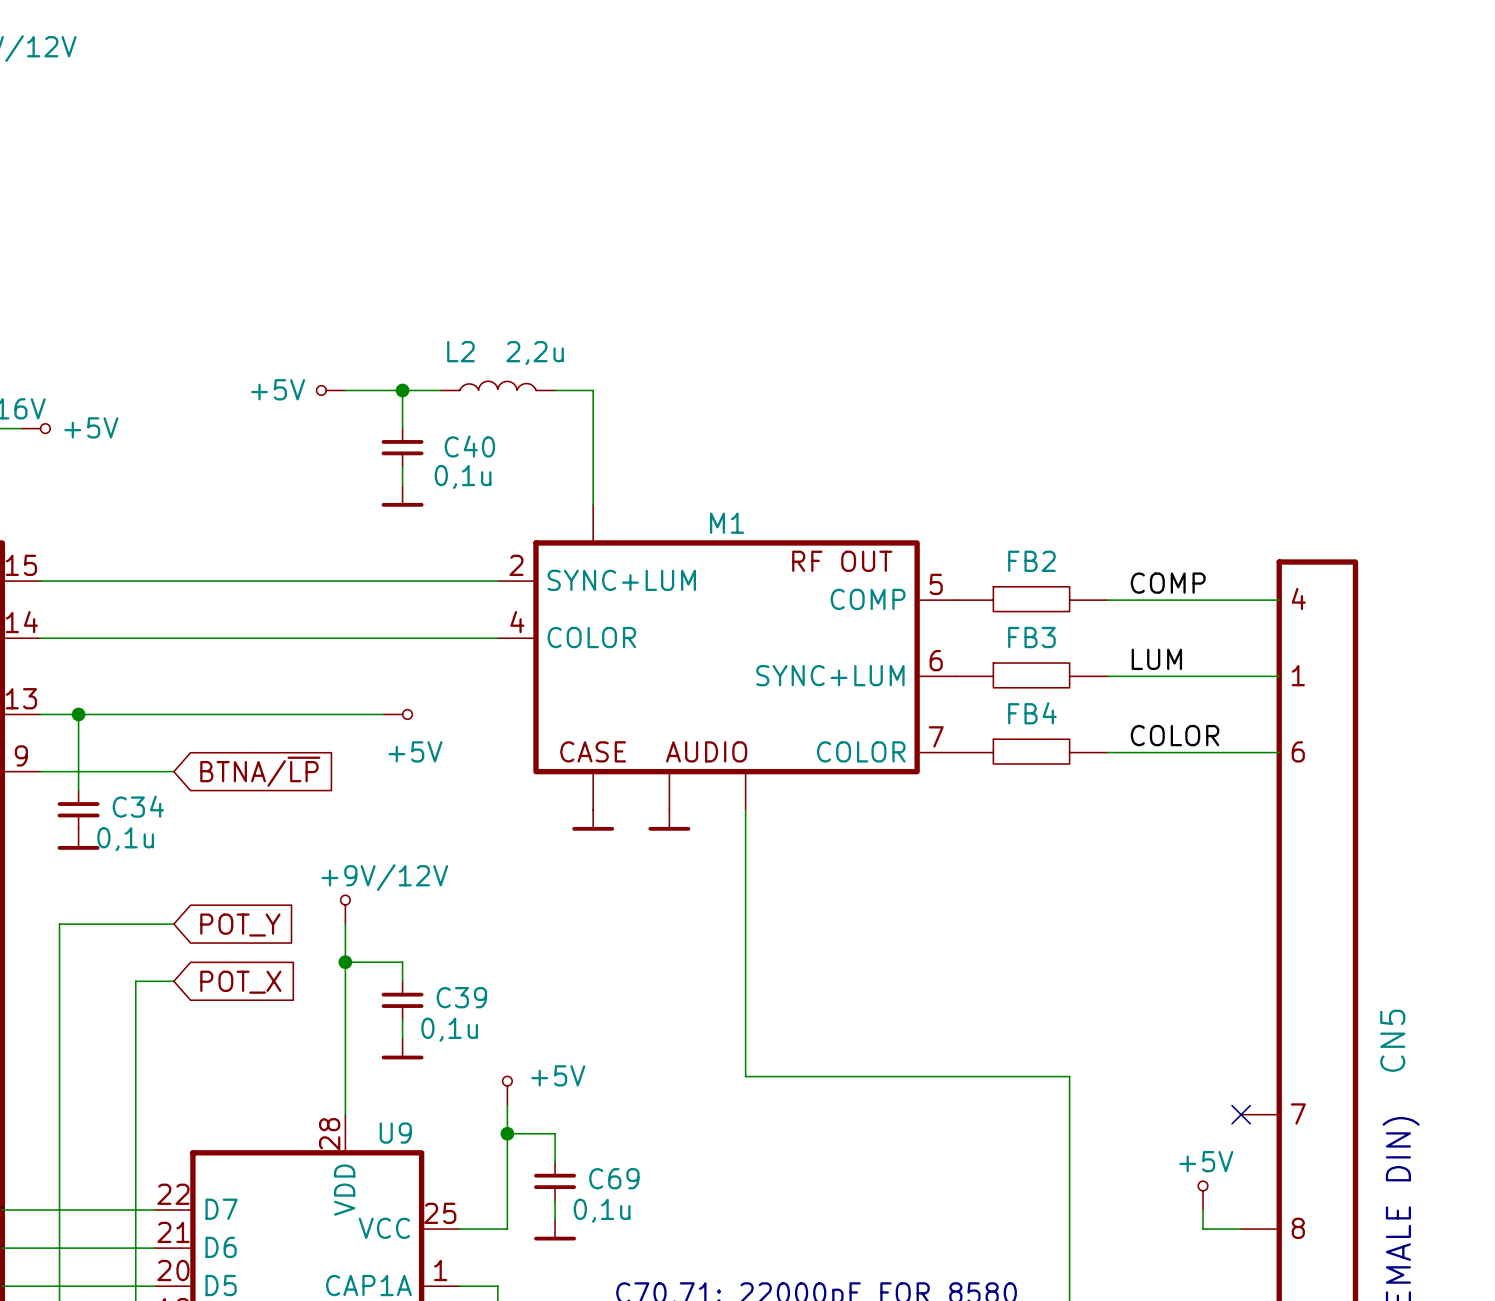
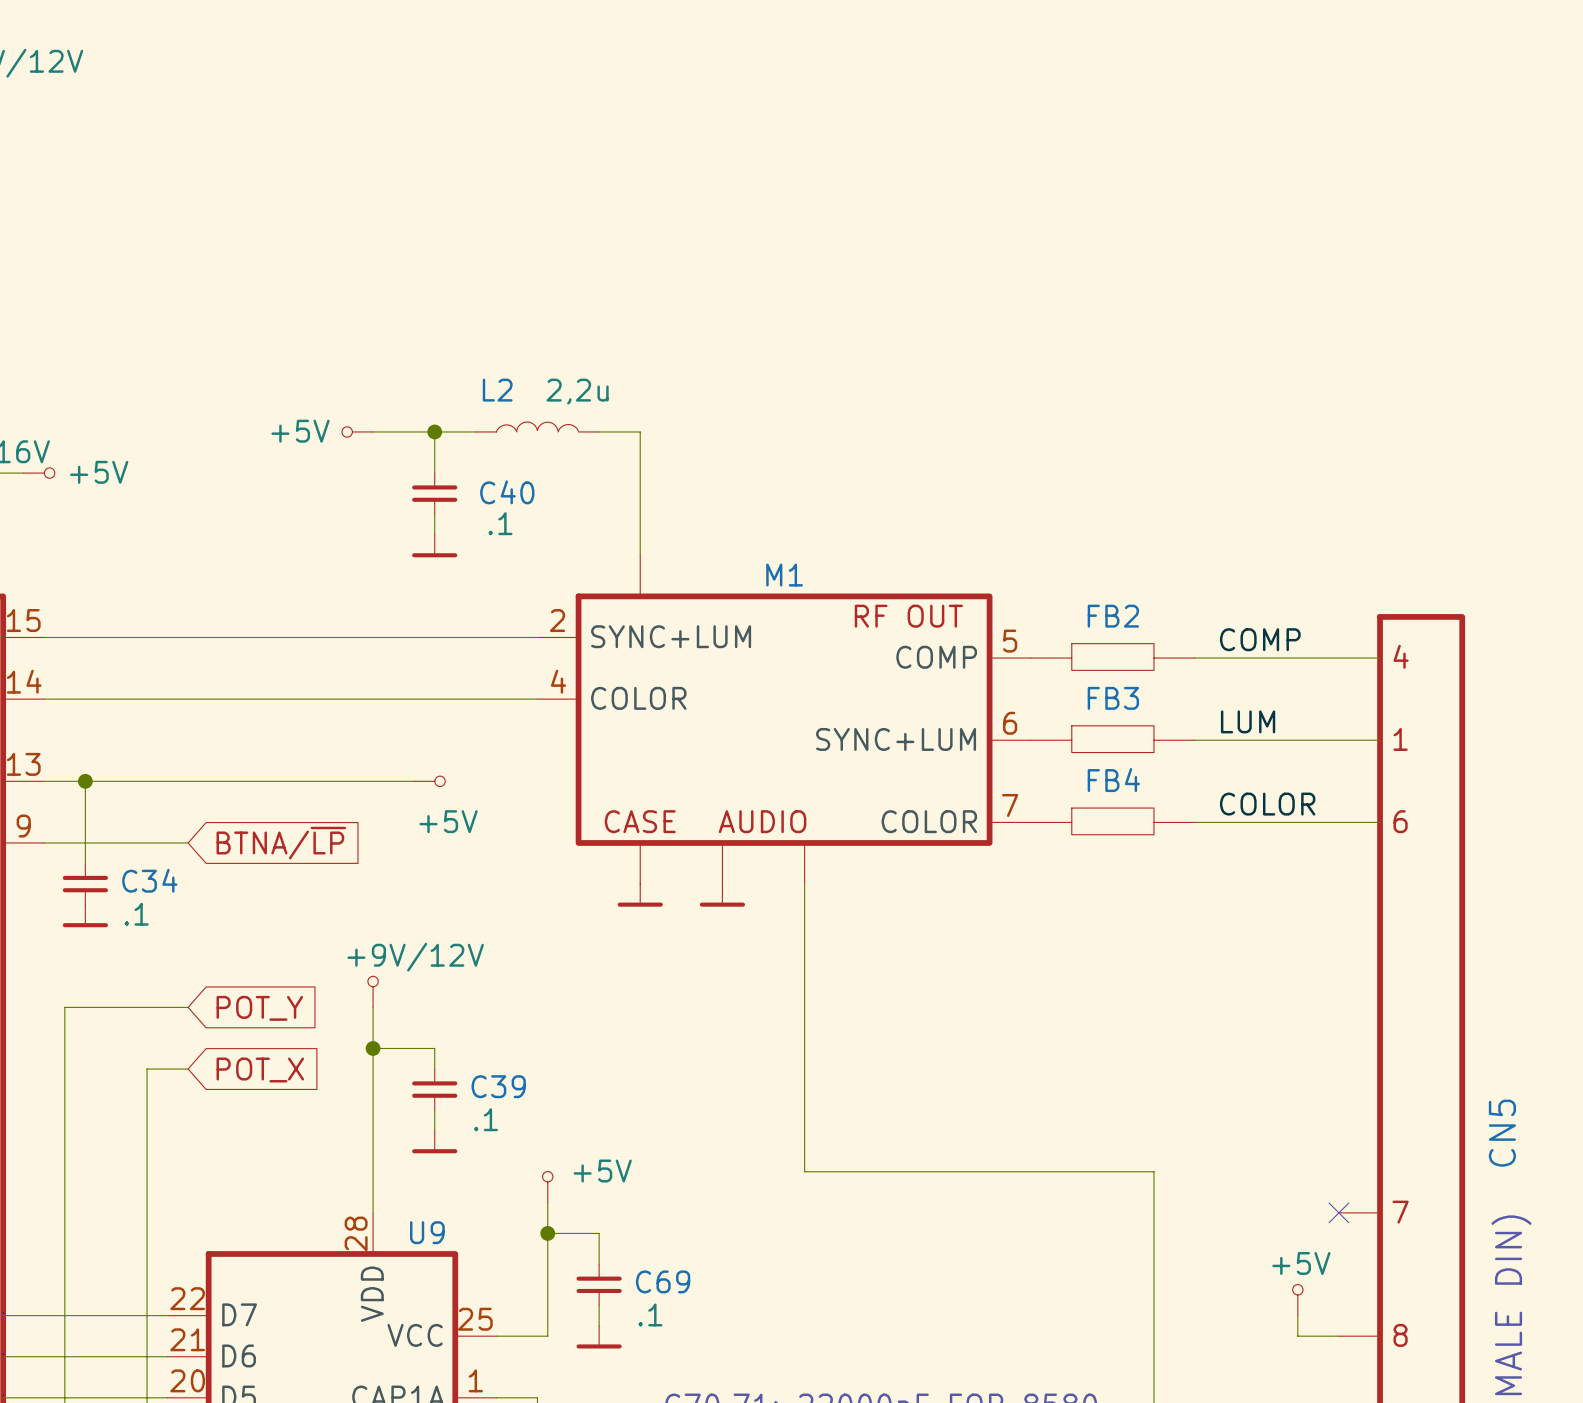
C40 value: 0,1u (463, 476) -> .1 (500, 523)
C34 value: 0,1u (125, 839) -> .1 (136, 914)
C39 value: 0,1u (449, 1029) -> .1 (486, 1119)
C69 value: 0,1u (602, 1210) -> .1 (650, 1314)

